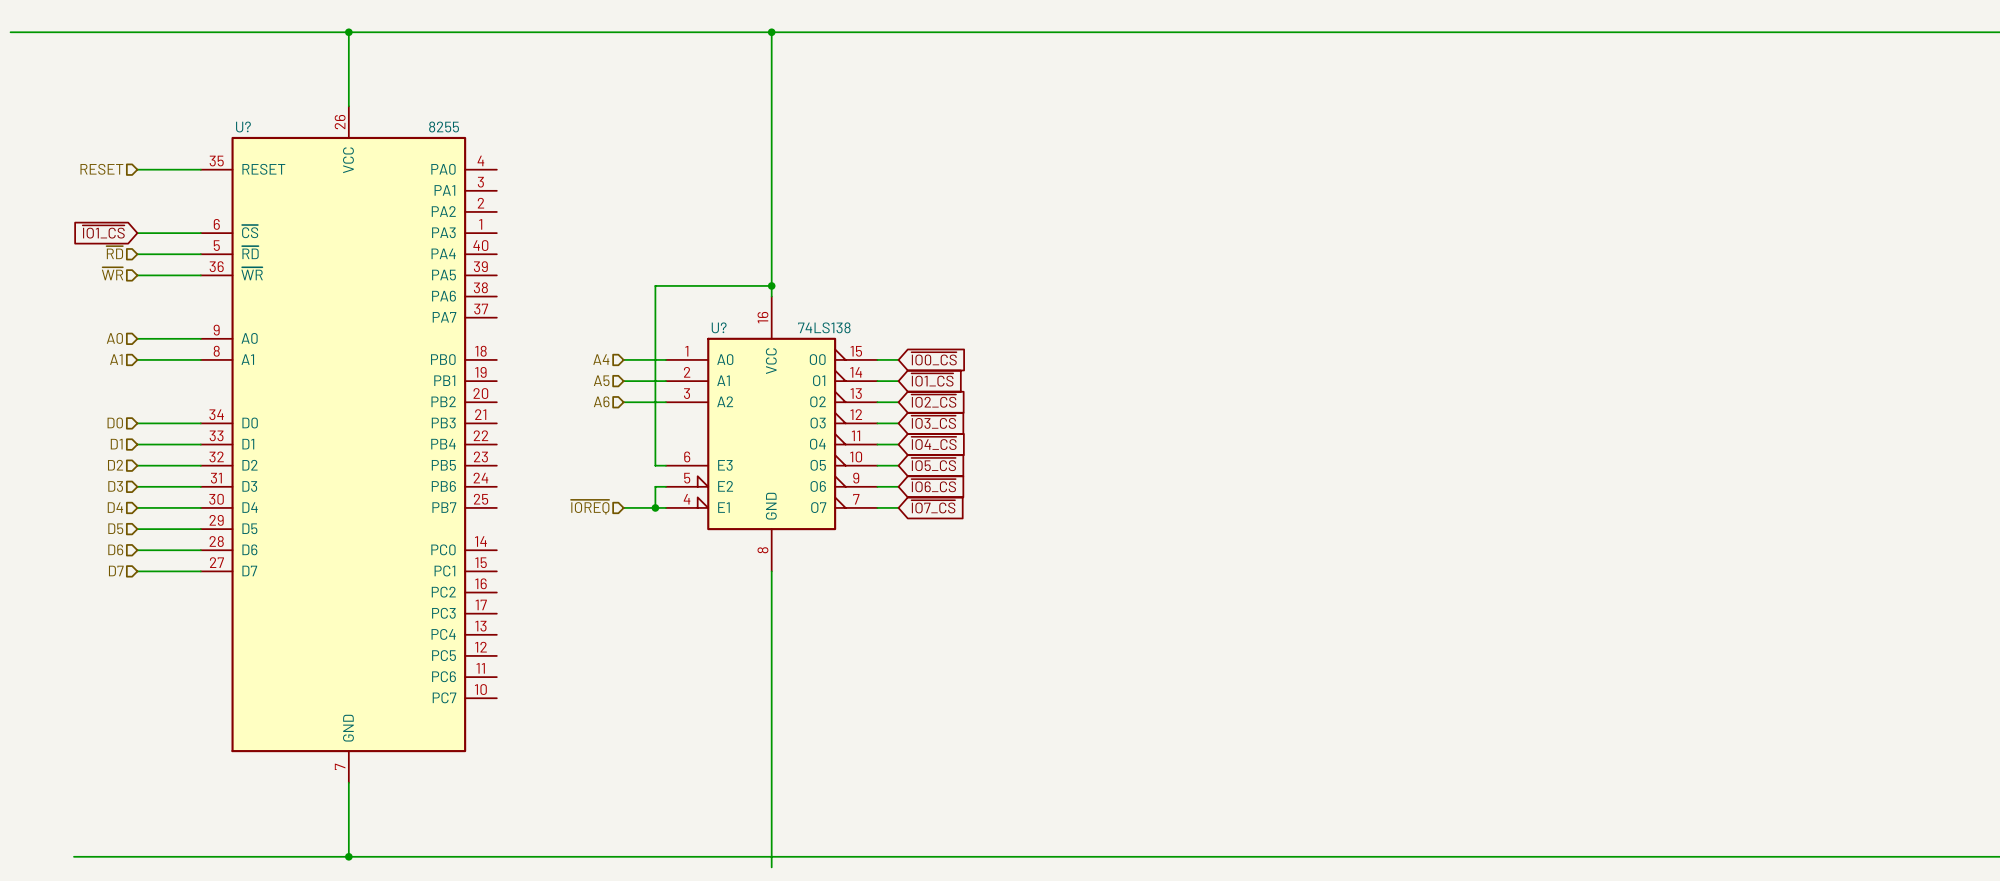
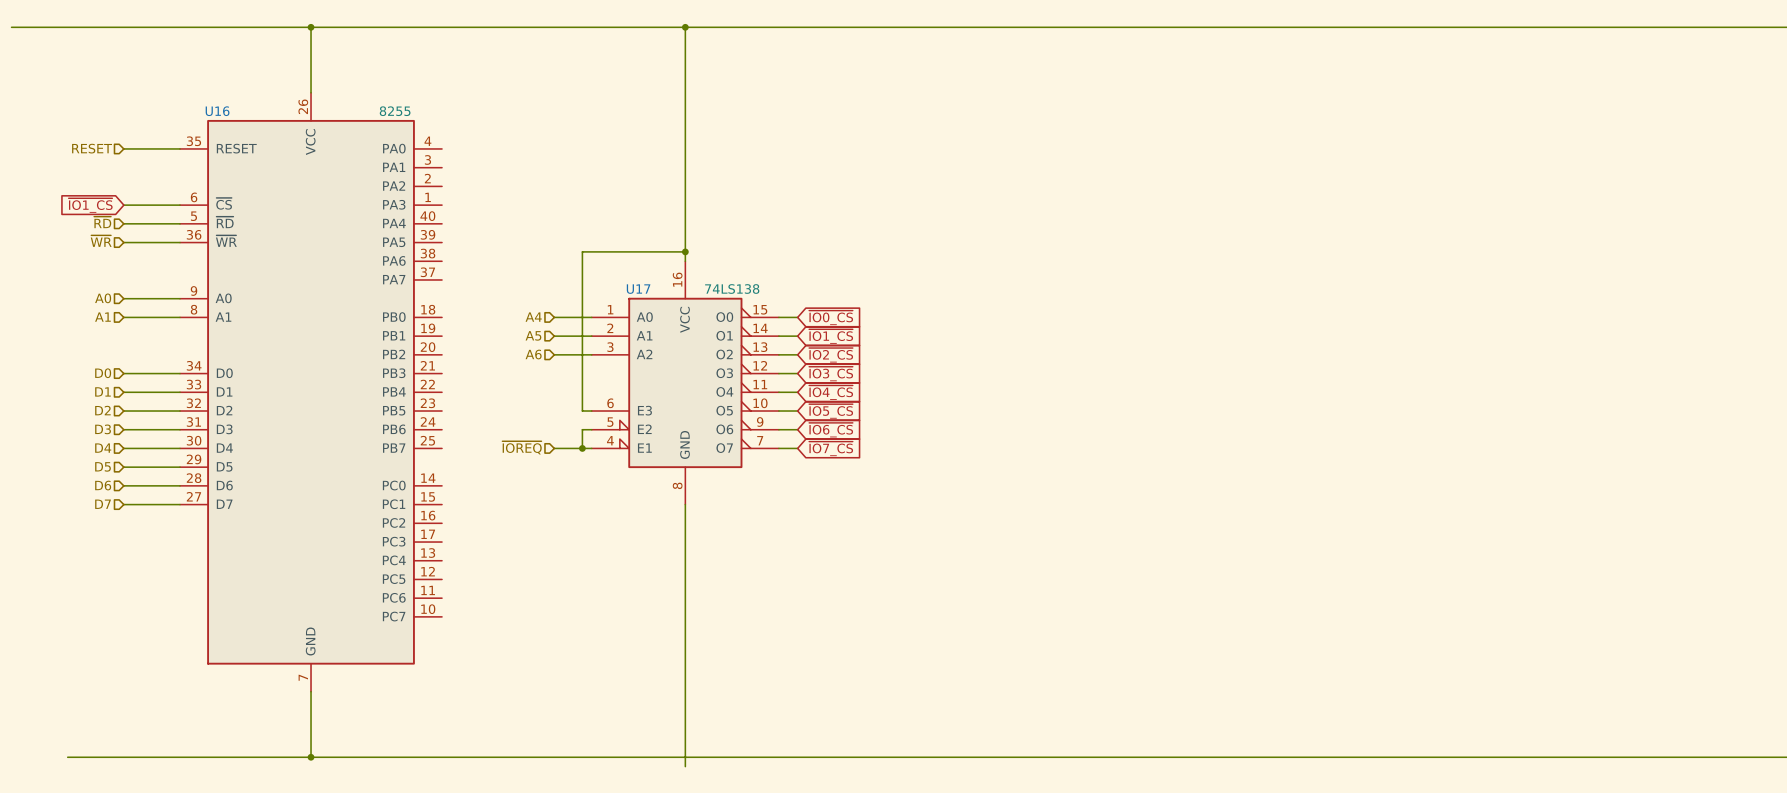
U? name: U? (243, 127) -> U16 (217, 111)
U? name: U? (719, 327) -> U17 (638, 289)

